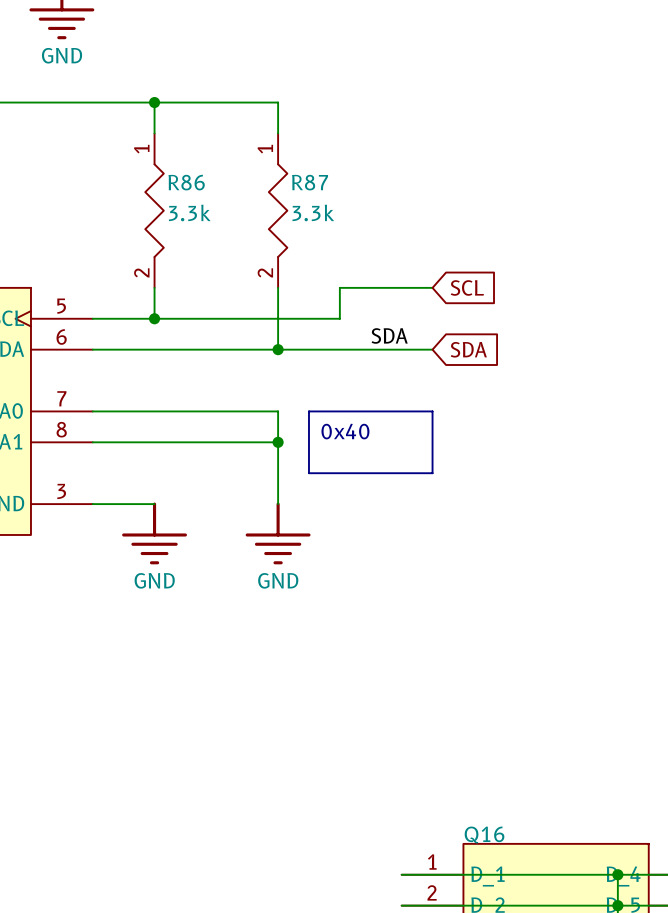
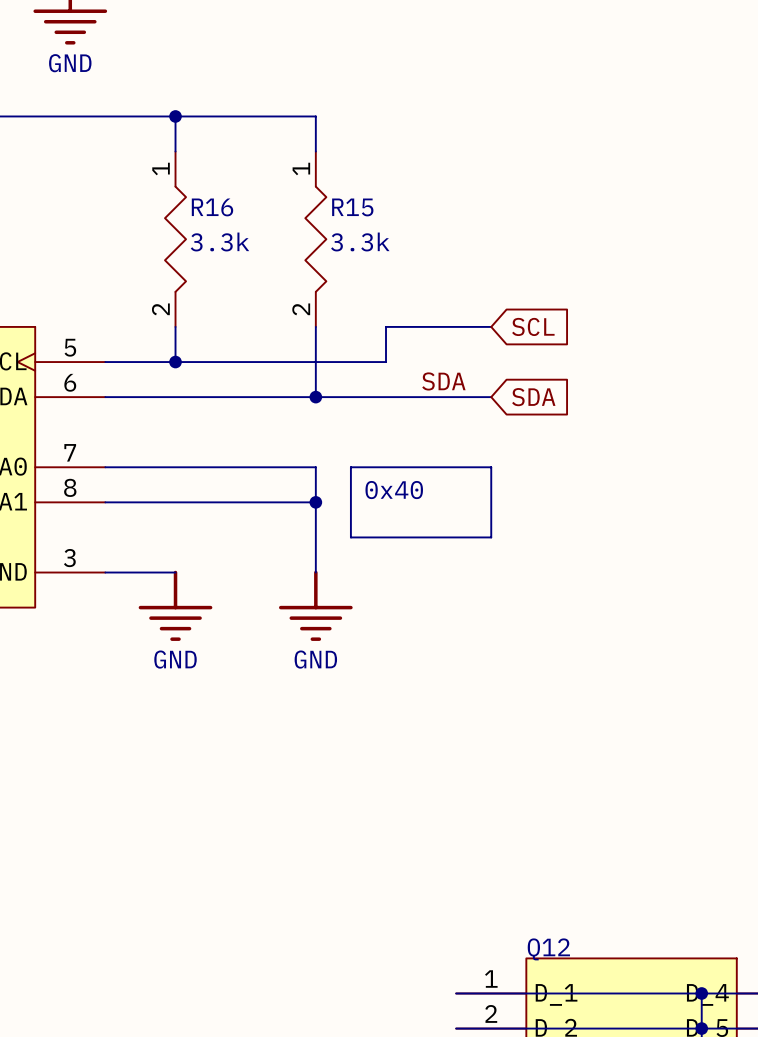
R86 name: R86 (186, 182) -> R16 (212, 207)
R87 name: R87 (310, 182) -> R15 (352, 207)
Q16 name: Q16 (484, 835) -> Q12 (548, 949)

